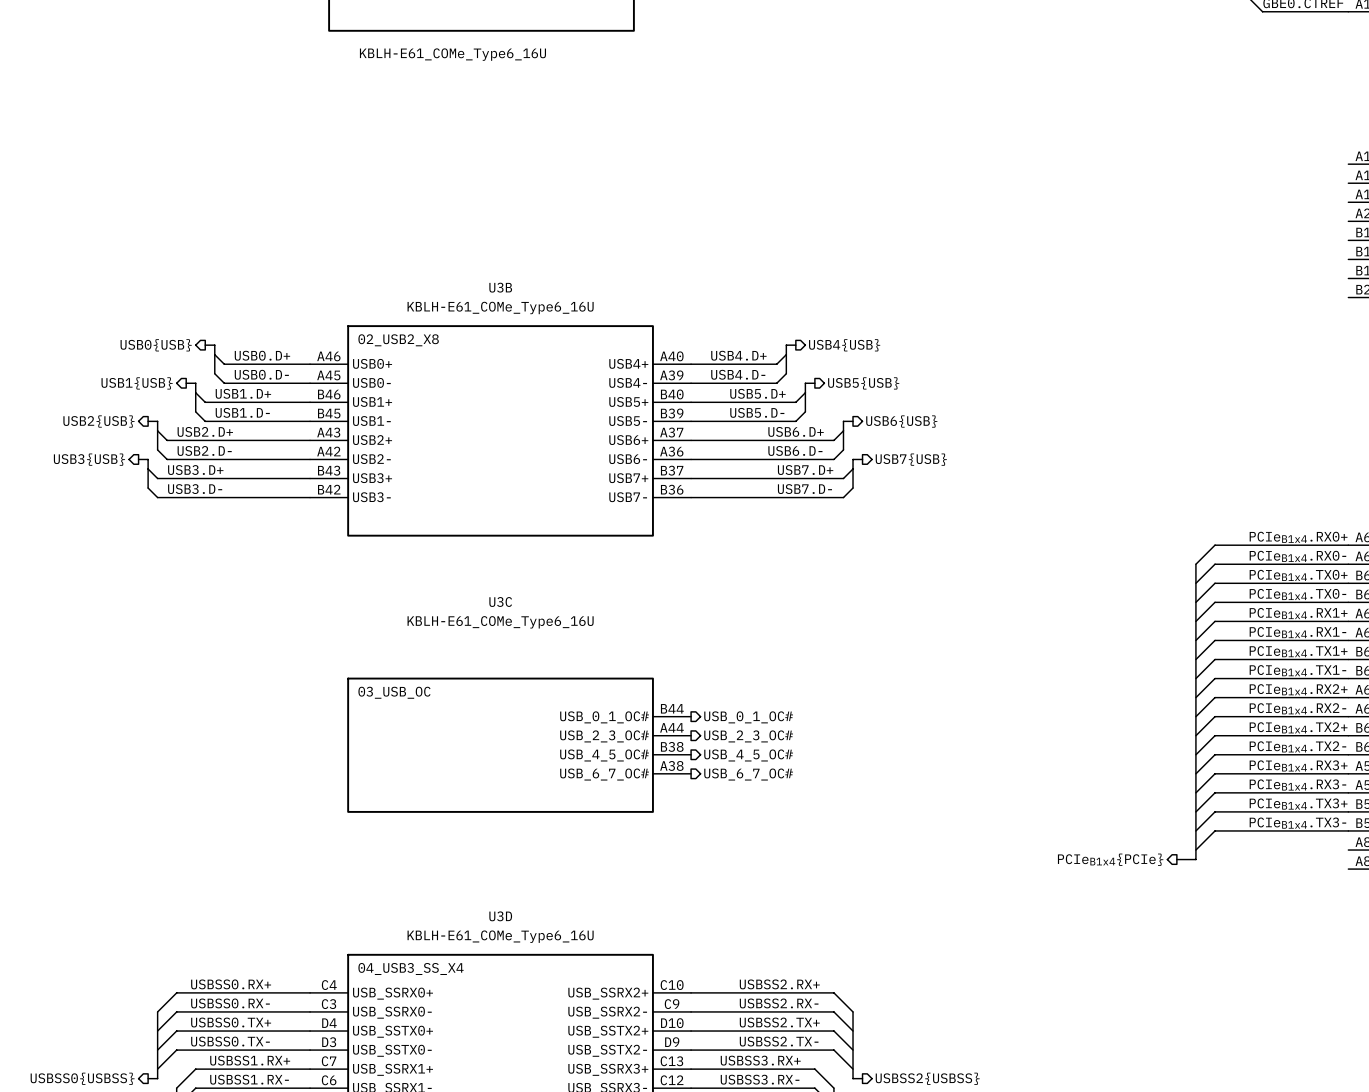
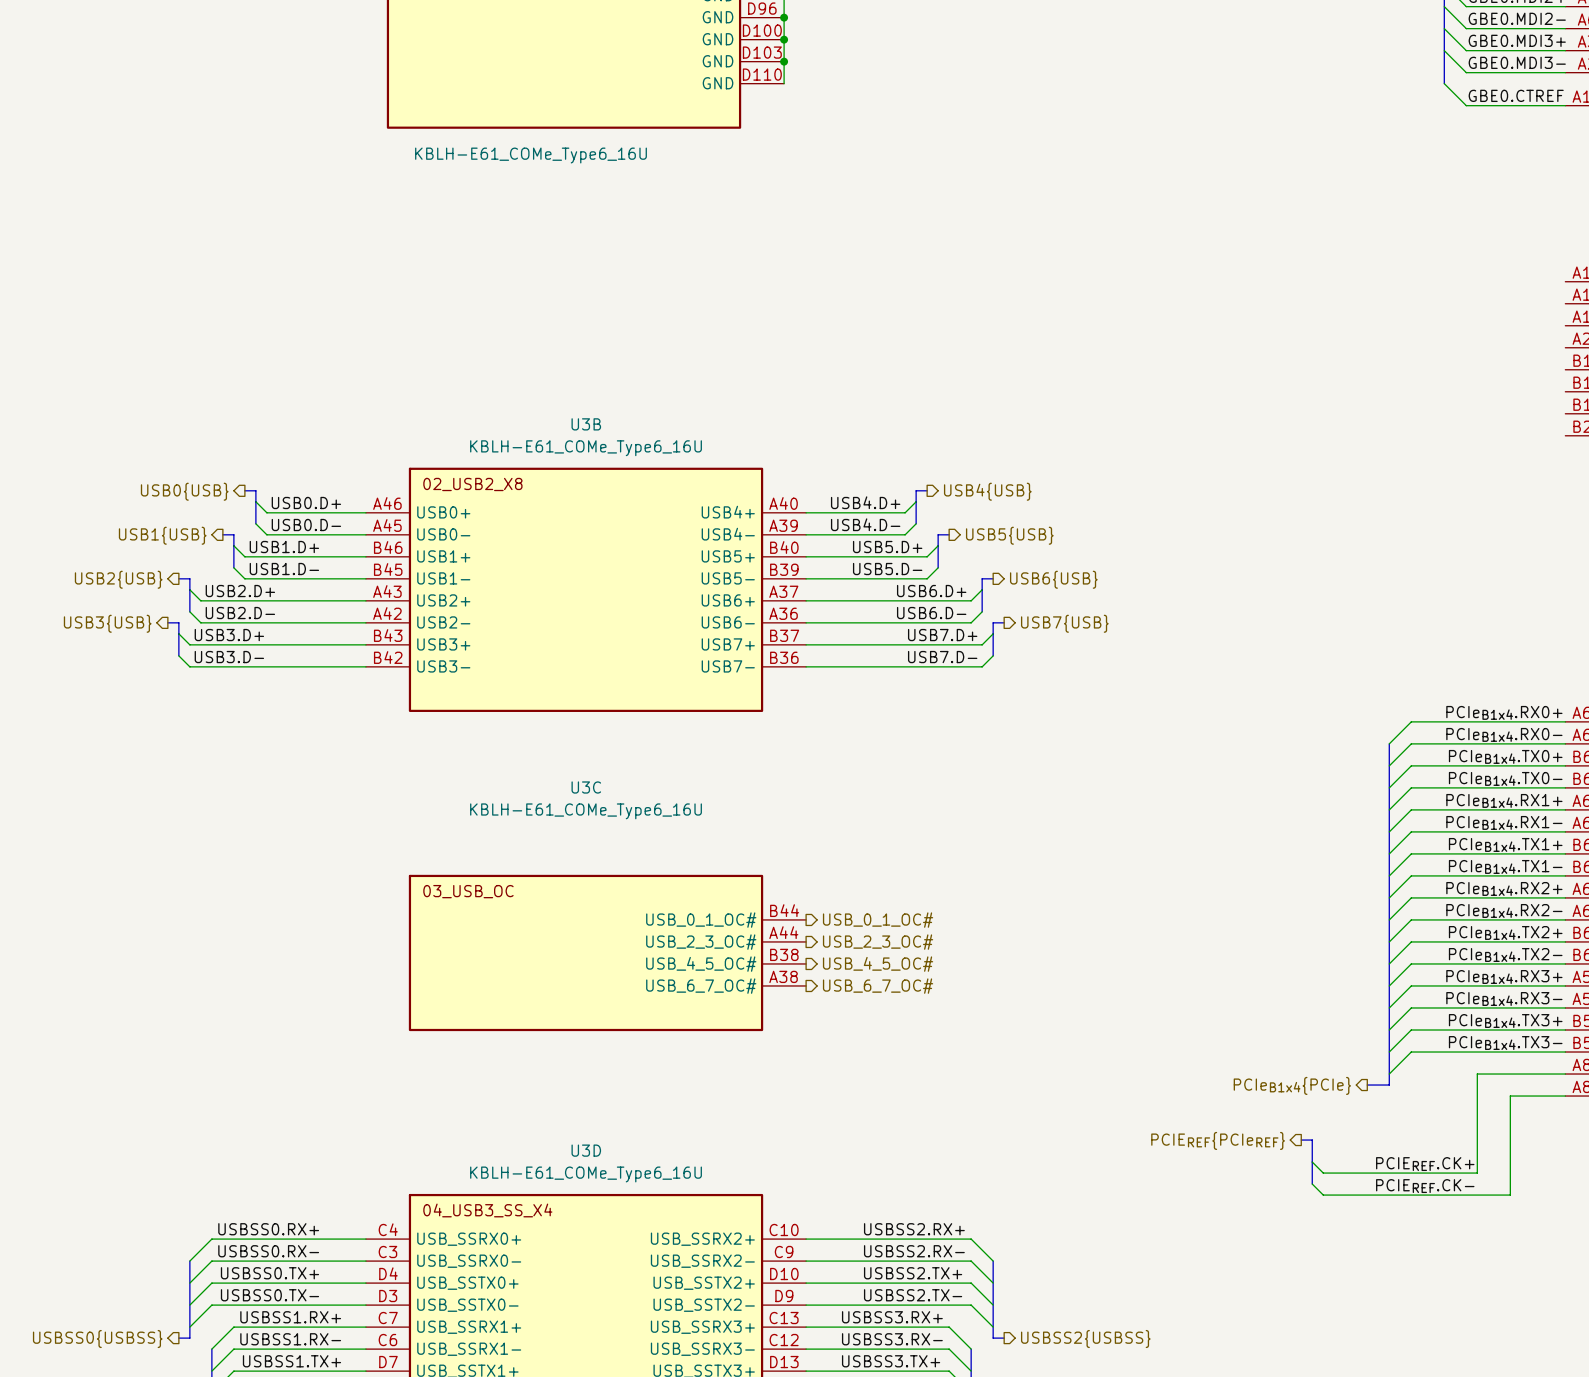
wire: none -> (1565, 1074) (1477, 1074) (1477, 1173) (1323, 1173) (1312, 1162)
wire: none -> (1565, 1096) (1510, 1096) (1510, 1195) (1323, 1195) (1312, 1184)
hierarchical label: none -> PCIEREF{PCIeREF} (1218, 1140)
bus: none -> (1301, 1140) (1312, 1140) (1312, 1184)
label: none -> PCIEREF.CK+ (1425, 1164)
label: none -> PCIEREF.CK- (1425, 1186)

